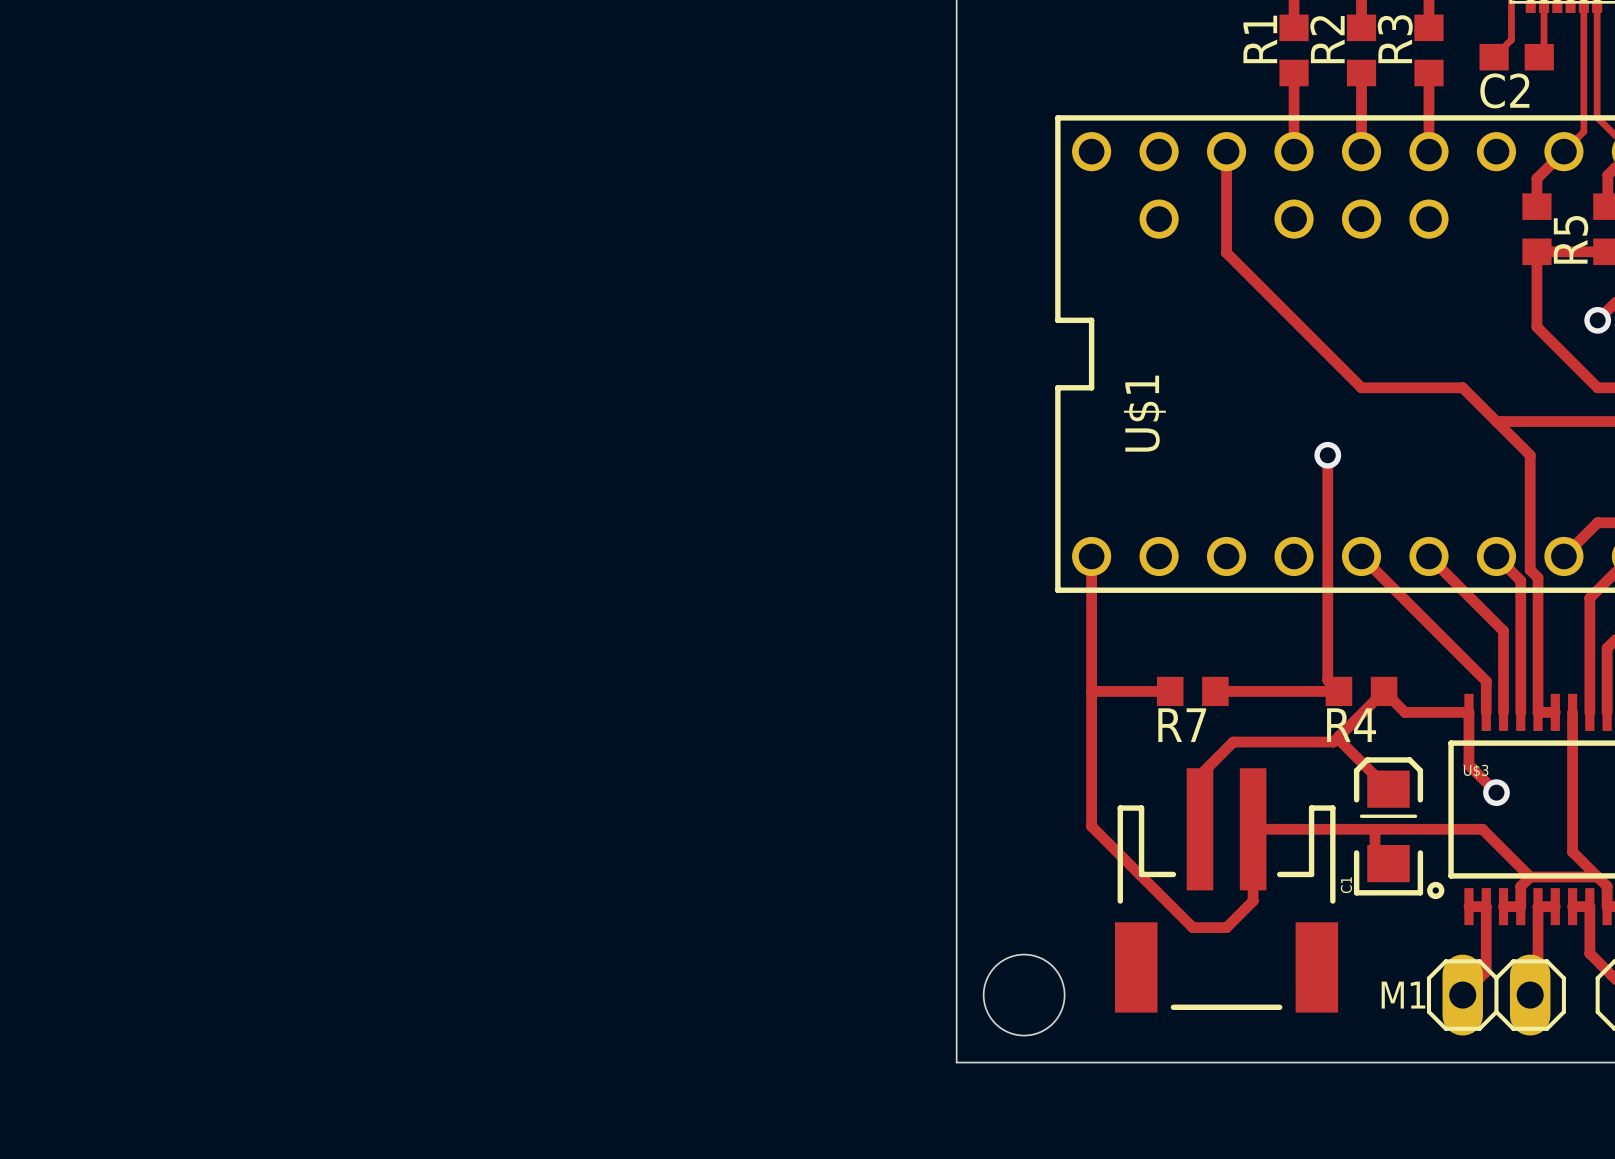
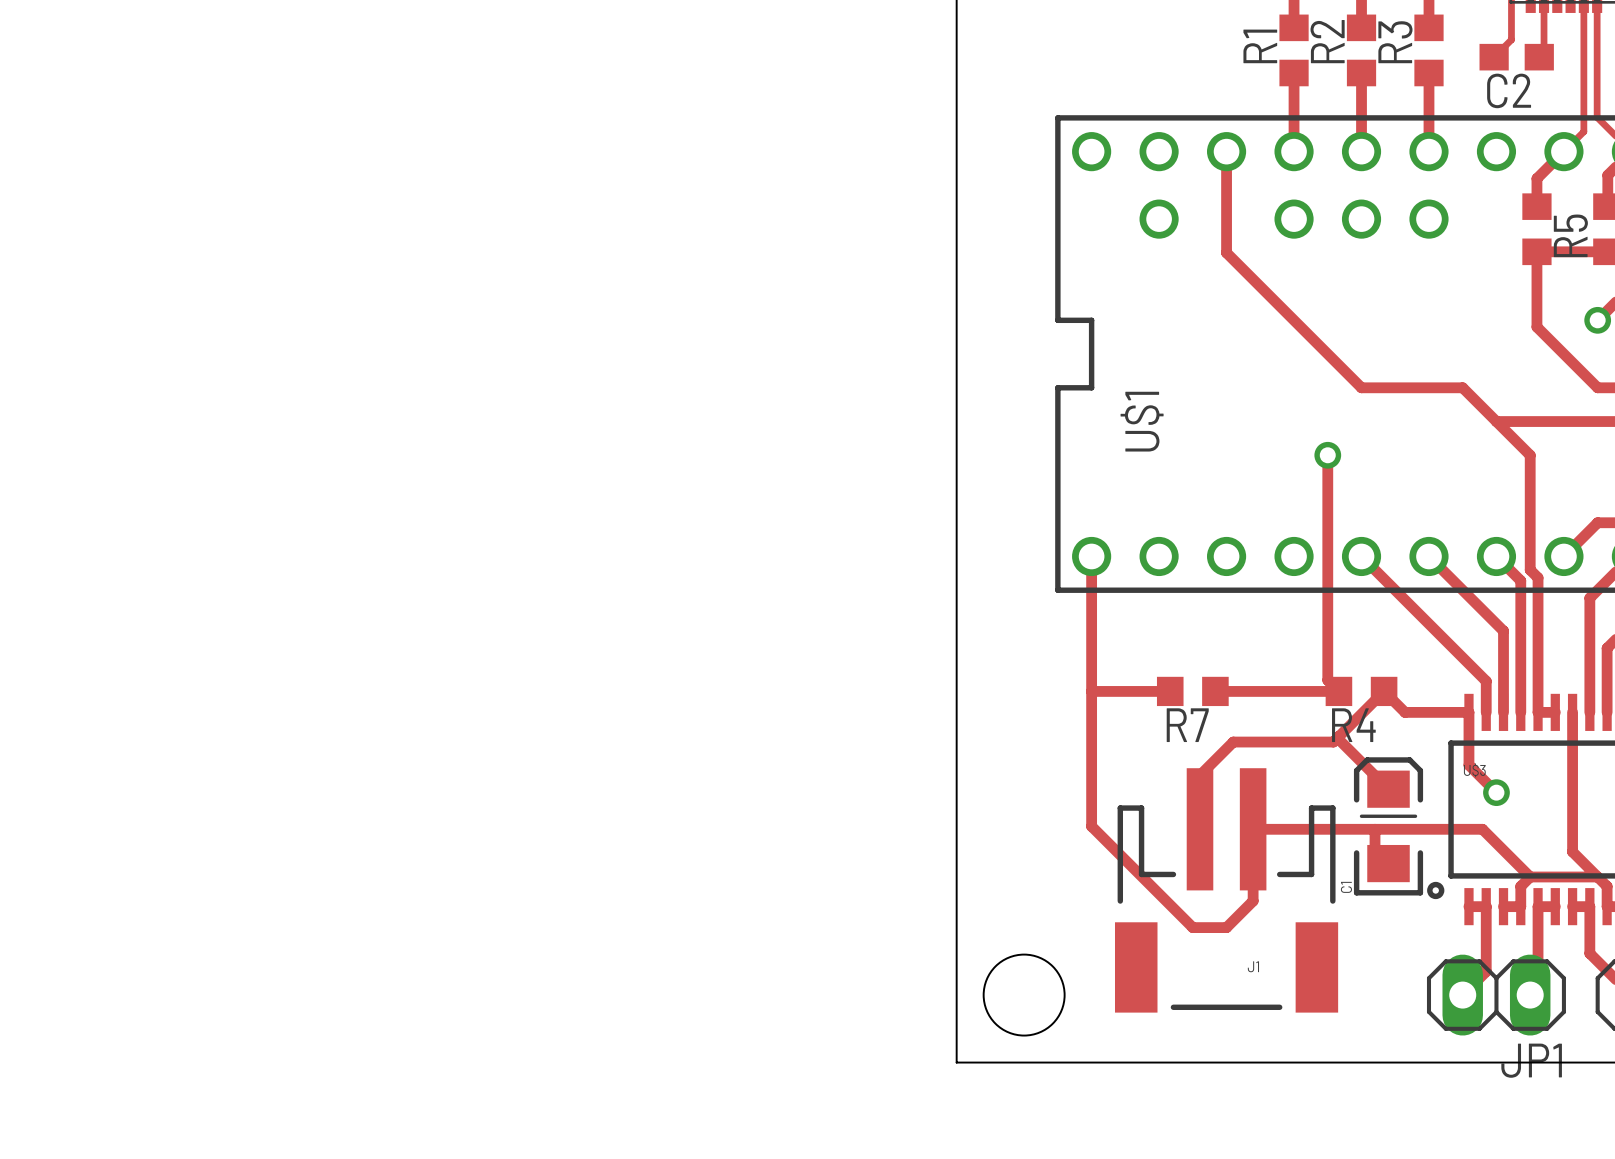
J1 name: none -> J1 (1253, 966)
text: M1 (1403, 995) -> none
JP1 name: none -> JP1 (1531, 1060)

